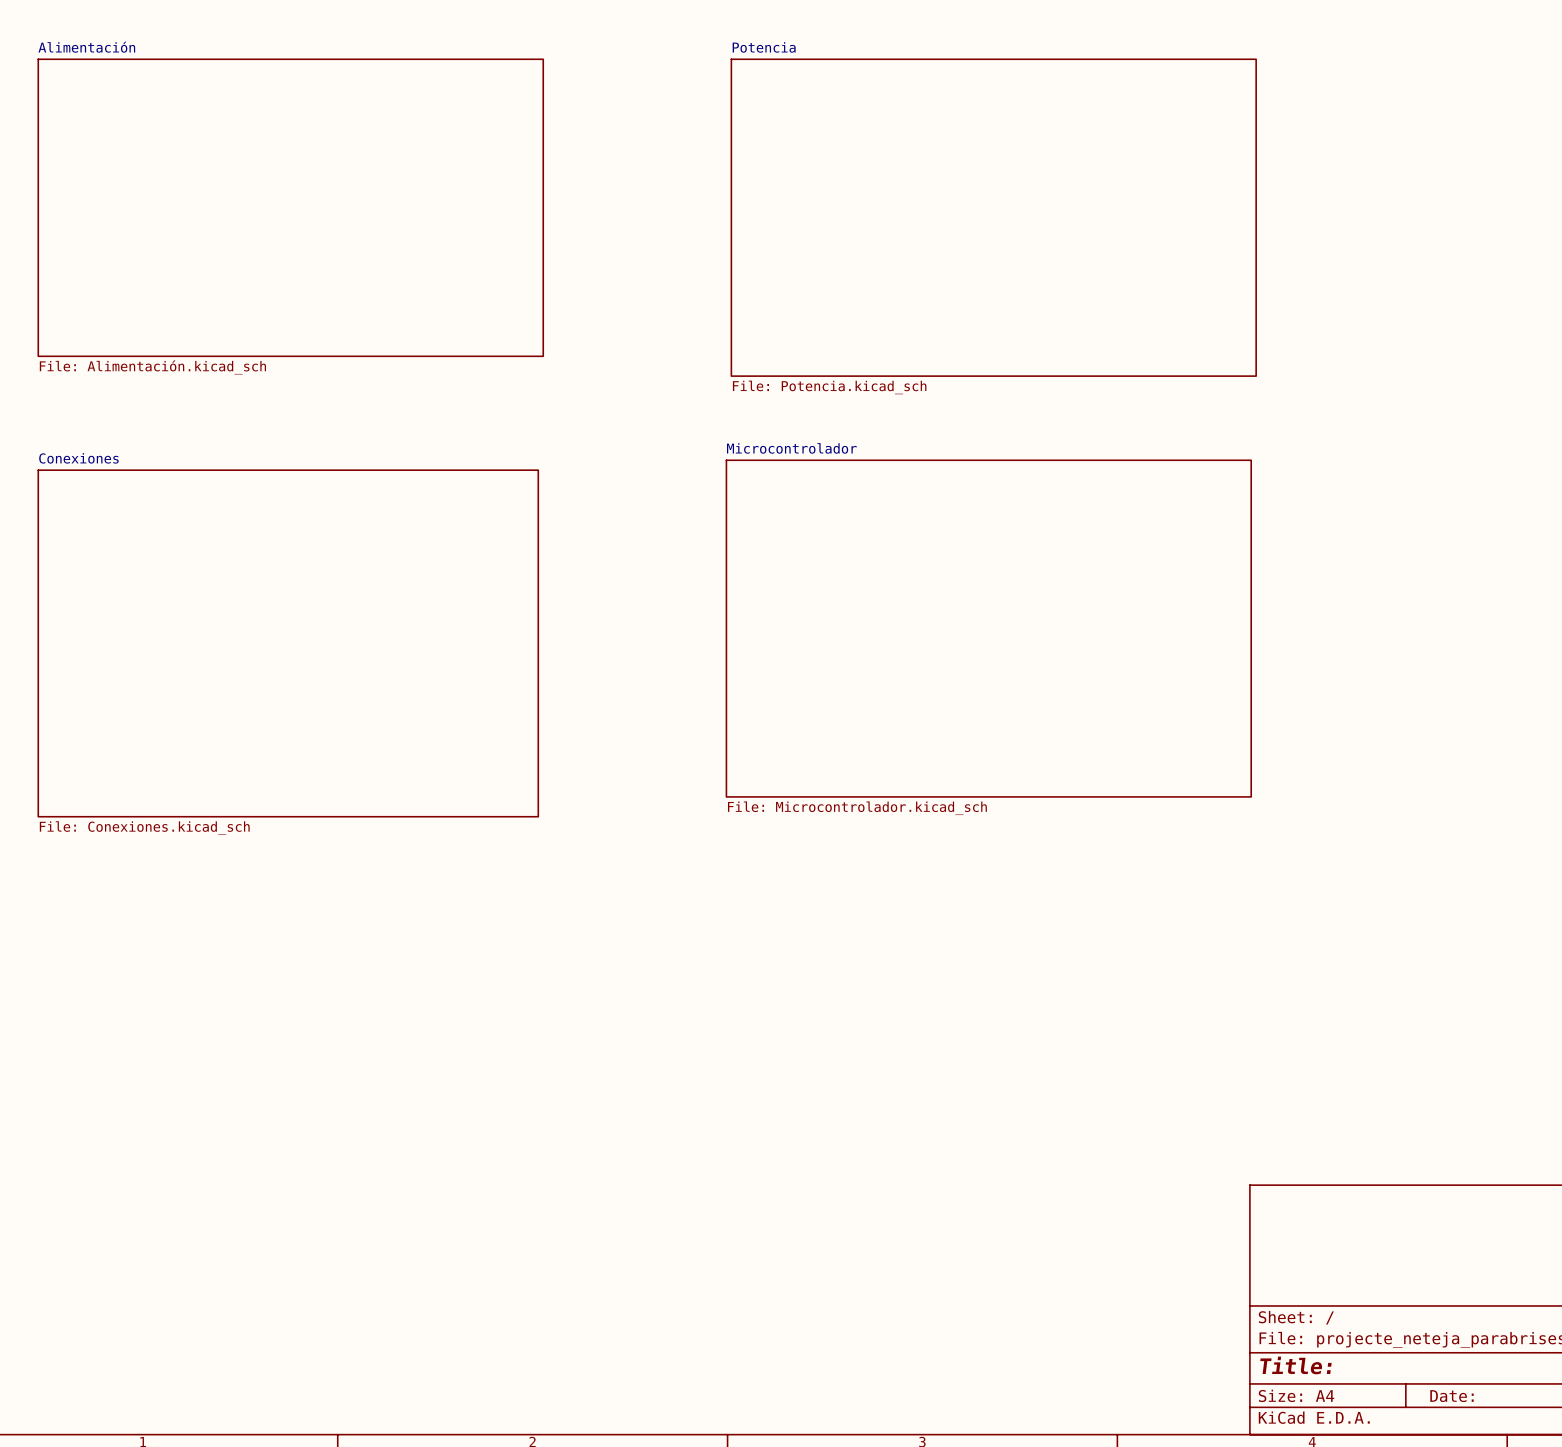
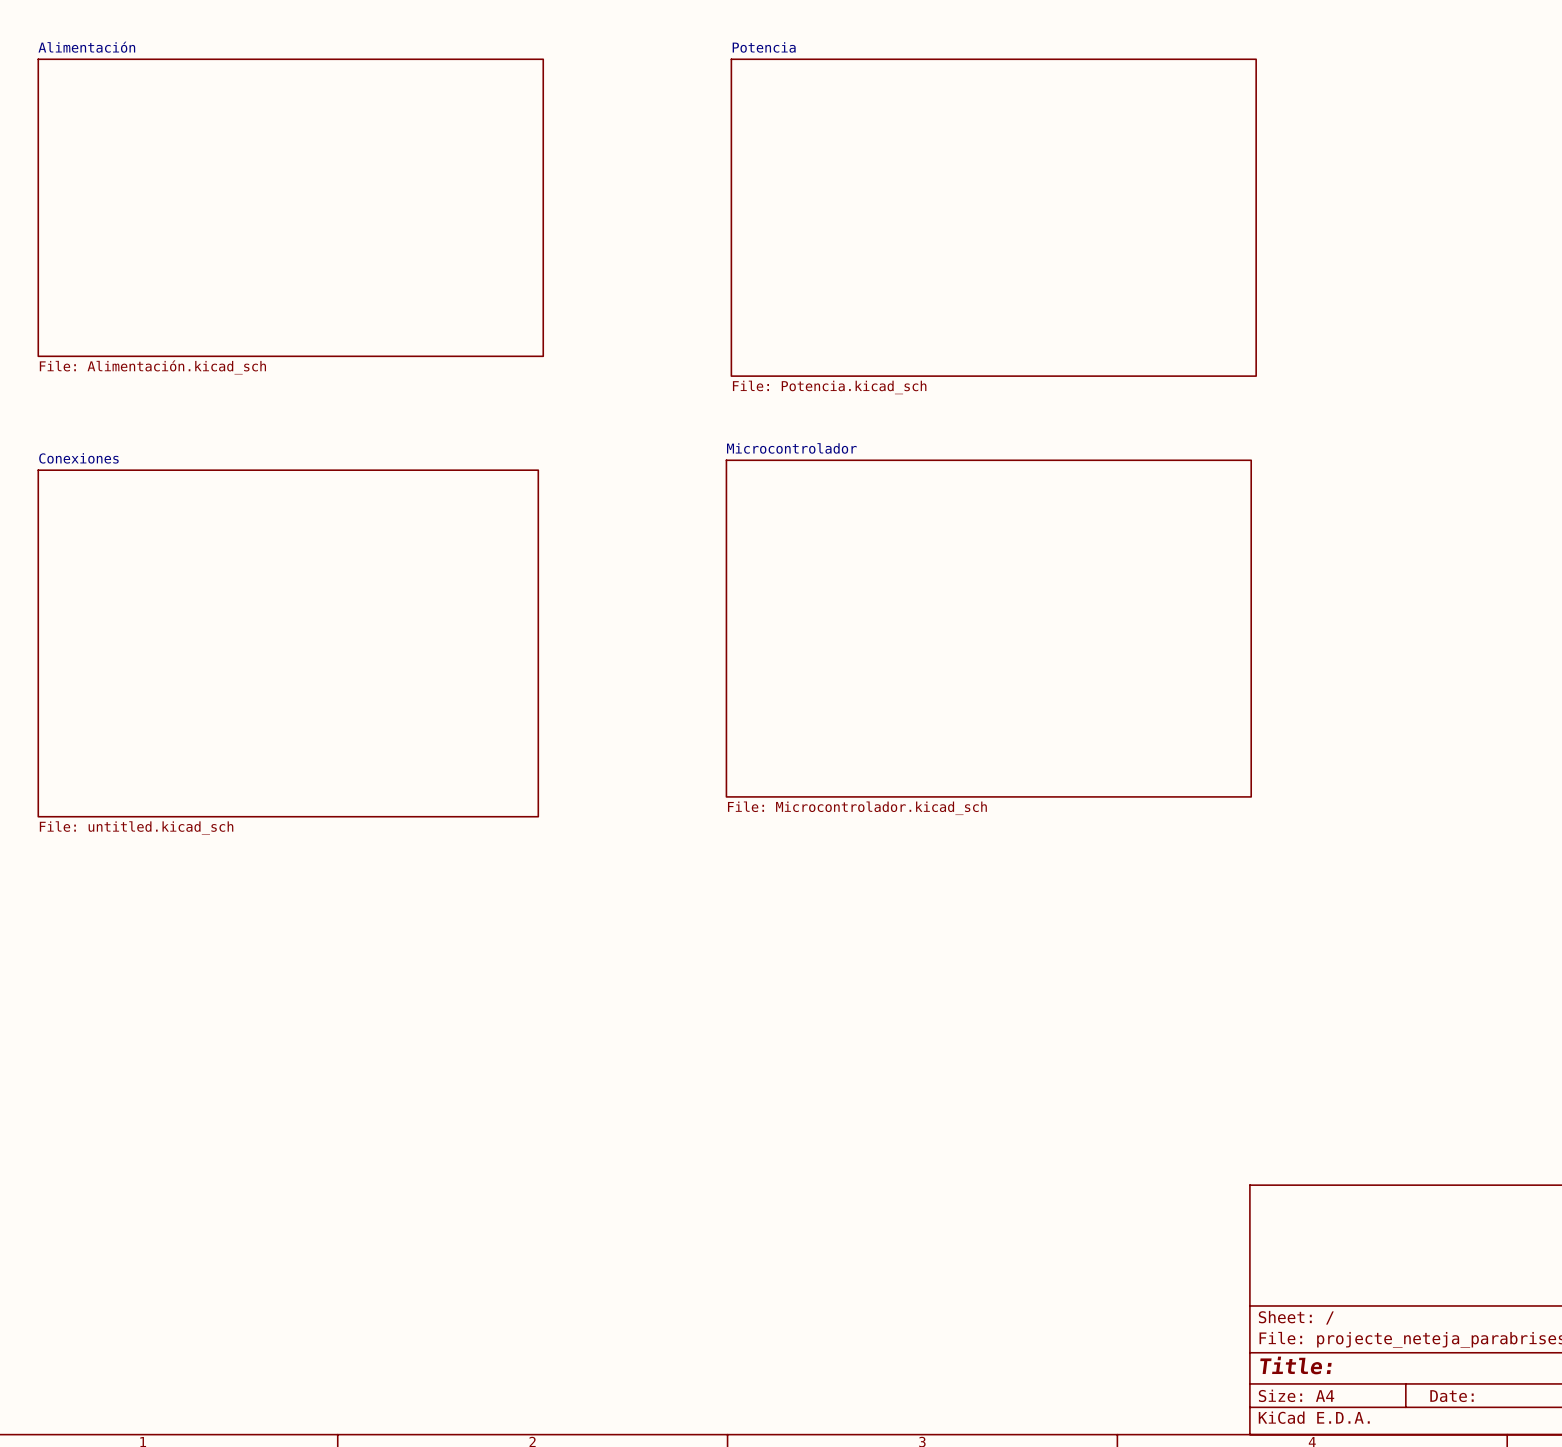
sheet Conexiones value: File: Conexiones.kicad_sch (144, 828) -> File: untitled.kicad_sch (136, 828)

